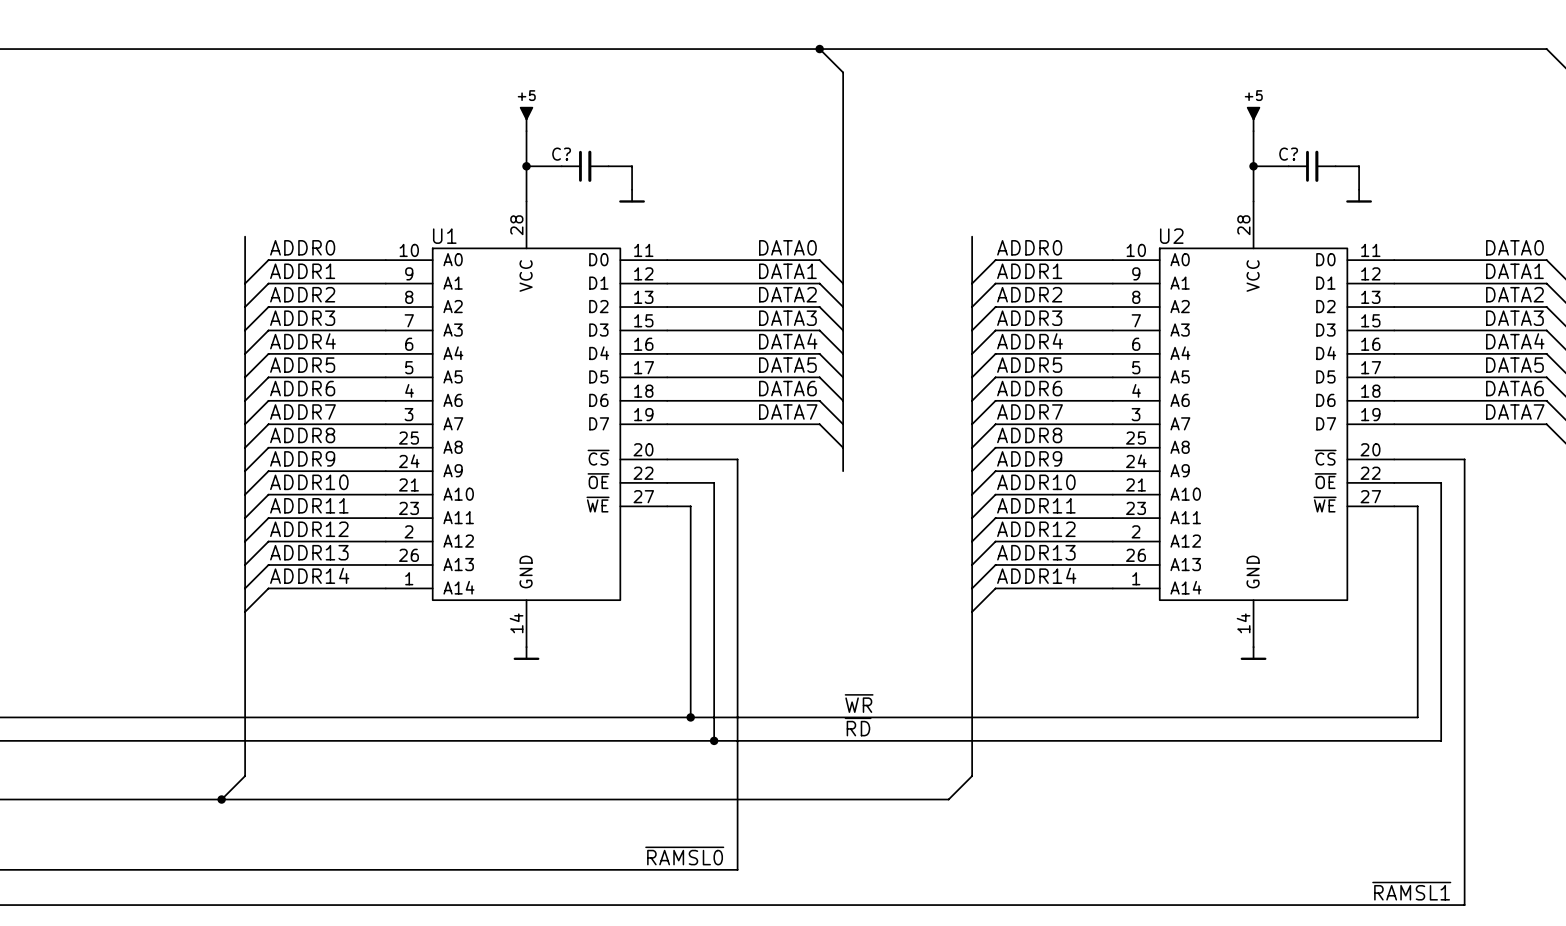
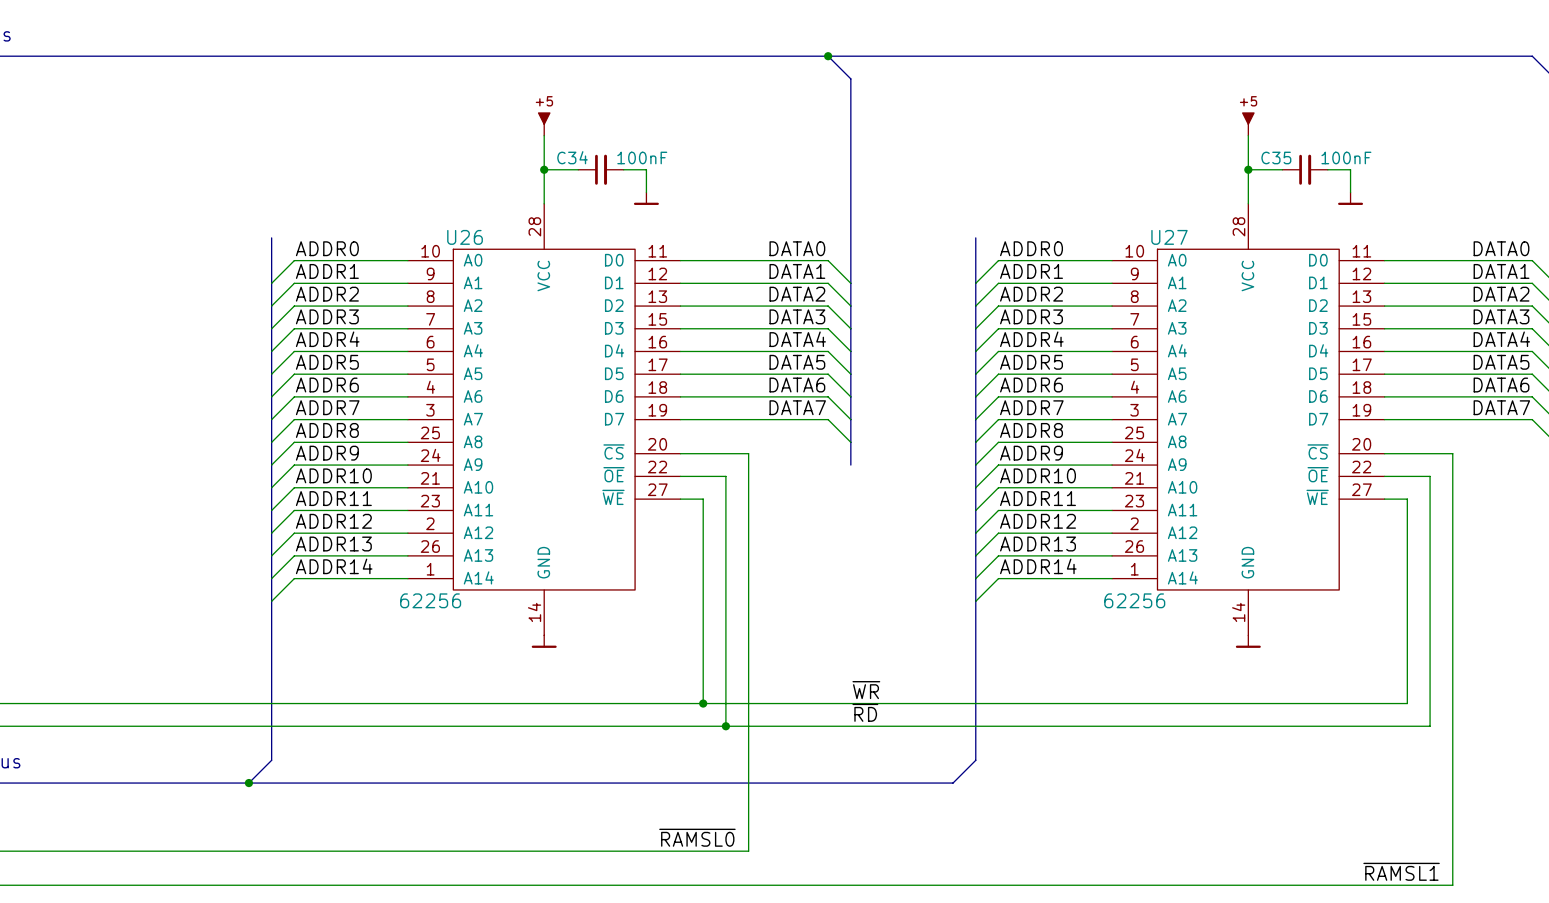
C? name: C? (561, 154) -> C34 (572, 157)
C? value: none -> 100nF (642, 157)
C? name: C? (1288, 154) -> C35 (1276, 157)
C? value: none -> 100nF (1346, 157)
U1 name: U1 (444, 236) -> U26 (465, 237)
U2 name: U2 (1171, 236) -> U27 (1169, 237)
U1 value: none -> 62256 (430, 600)
U2 value: none -> 62256 (1134, 600)

